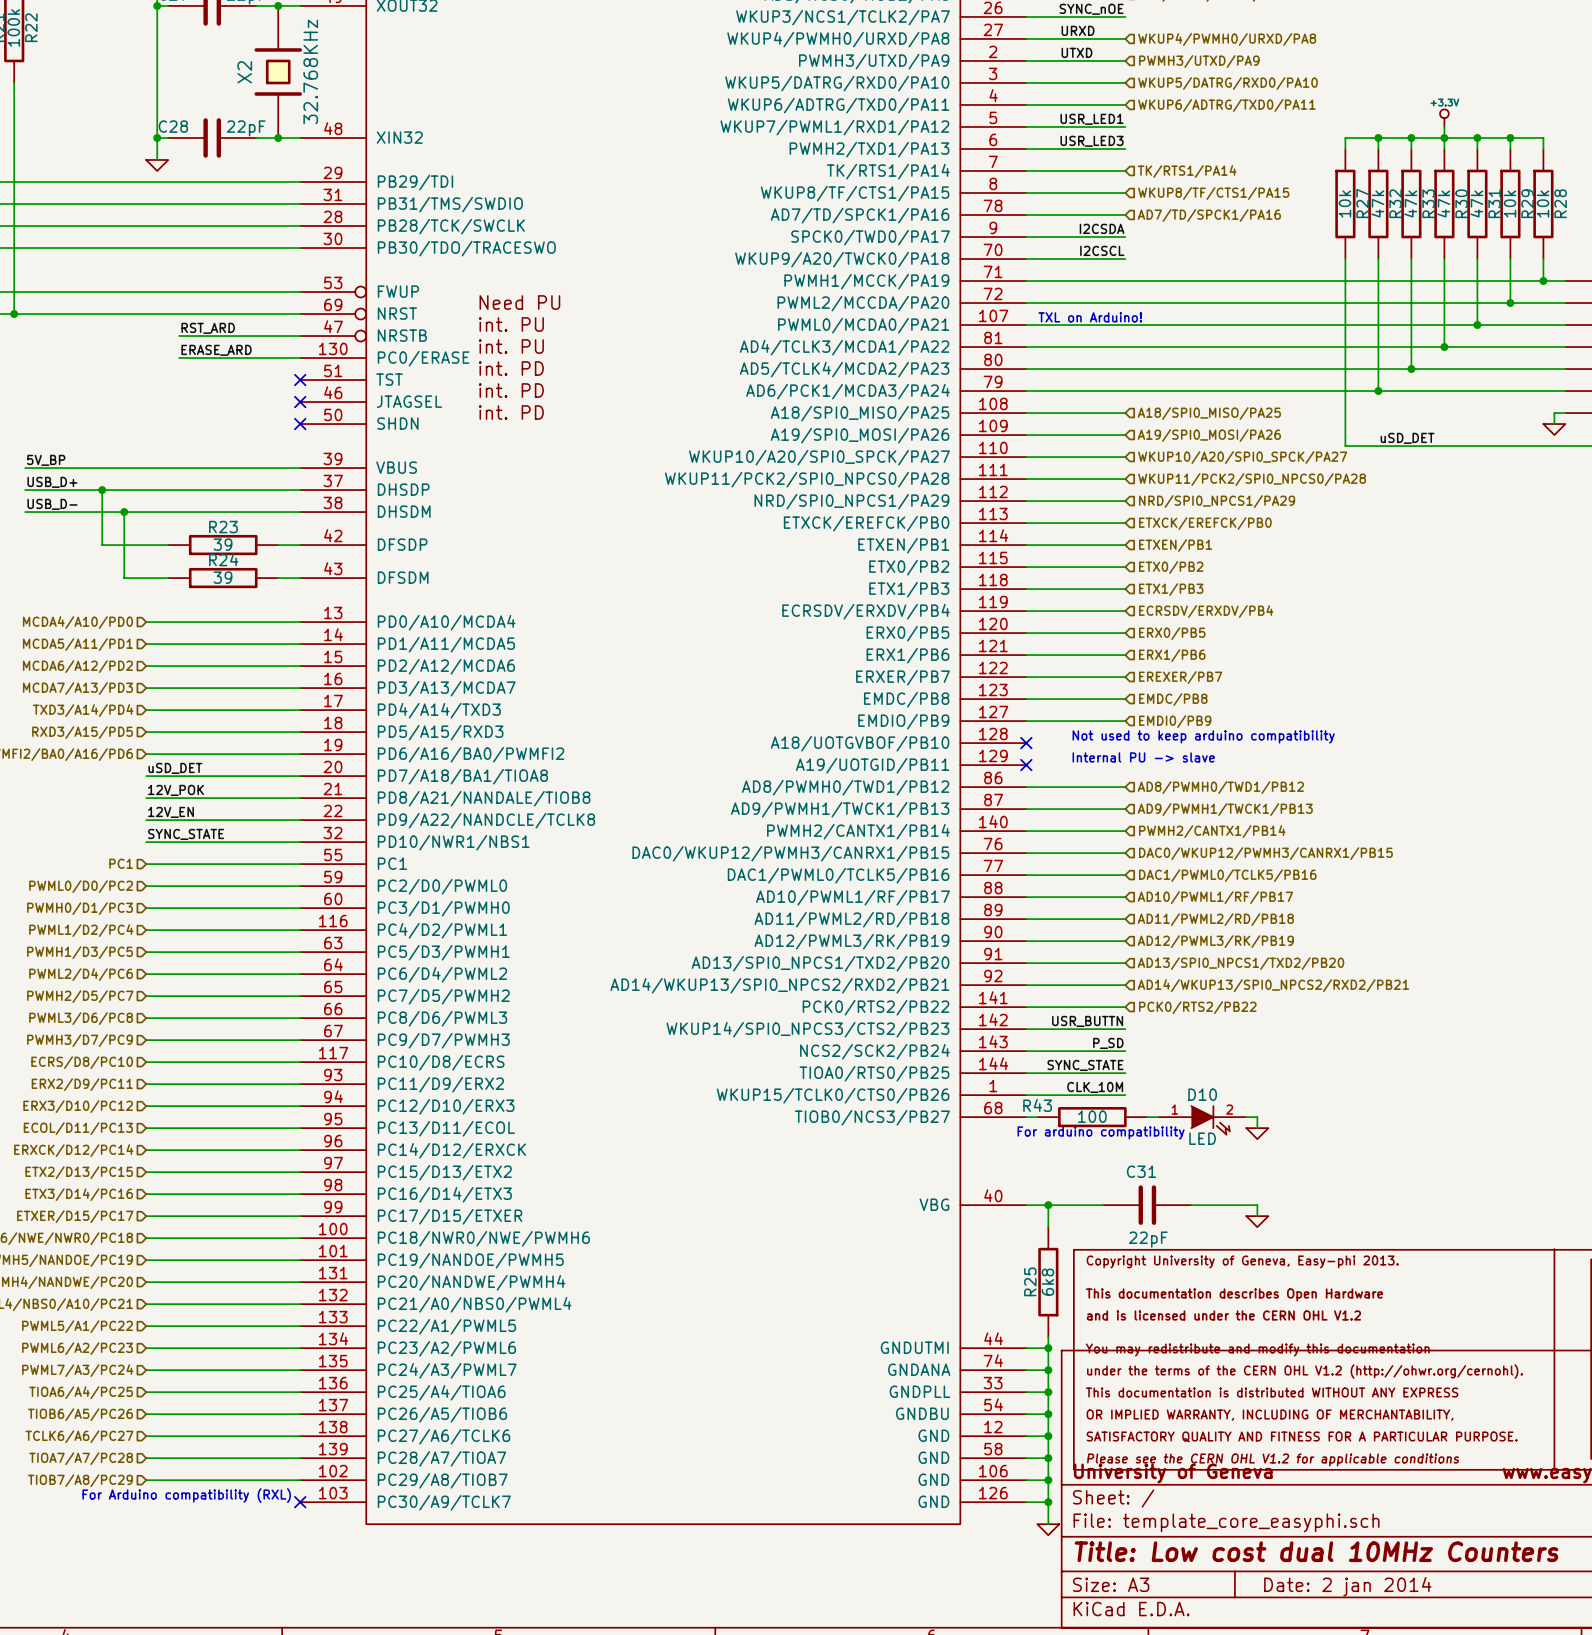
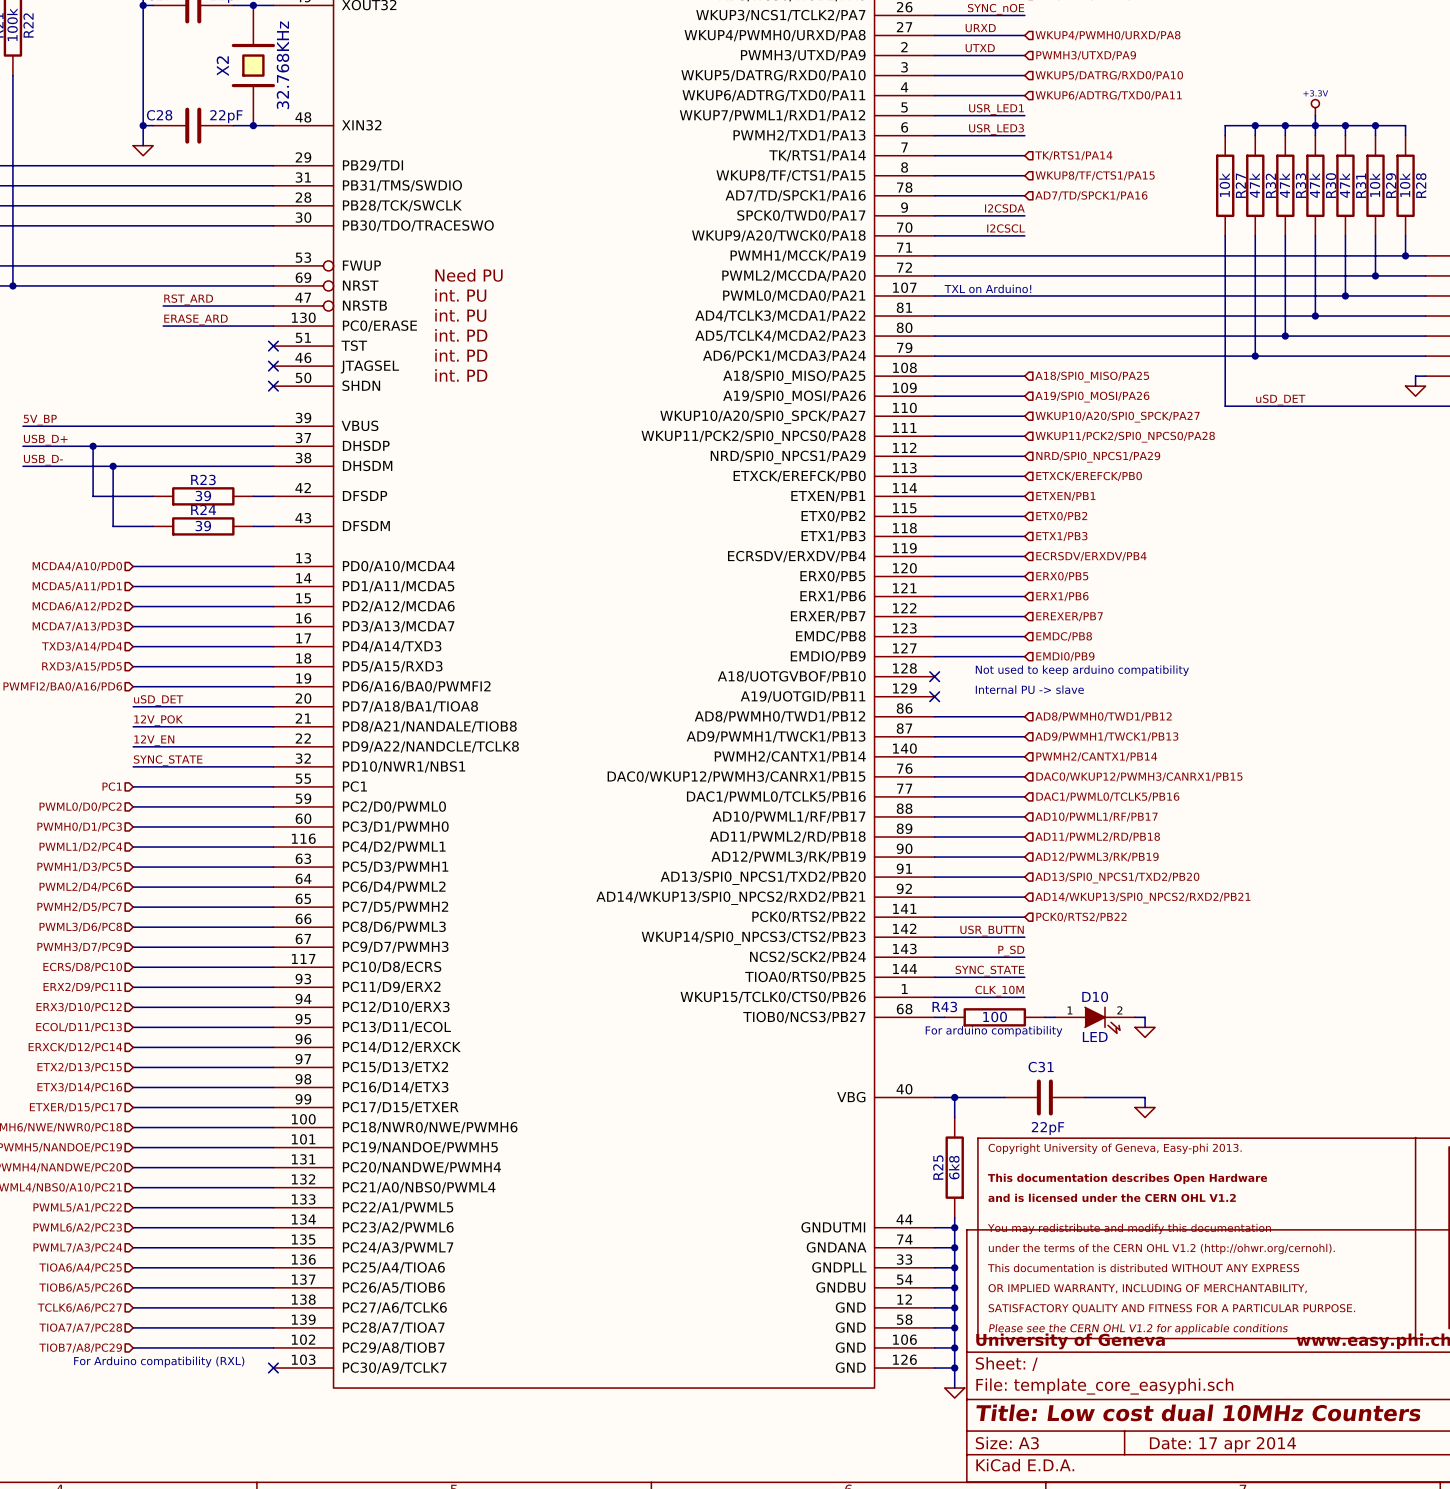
title block: Date: 2 jan 2014 (1347, 1586) -> Date: 17 apr 2014 (1222, 1444)

